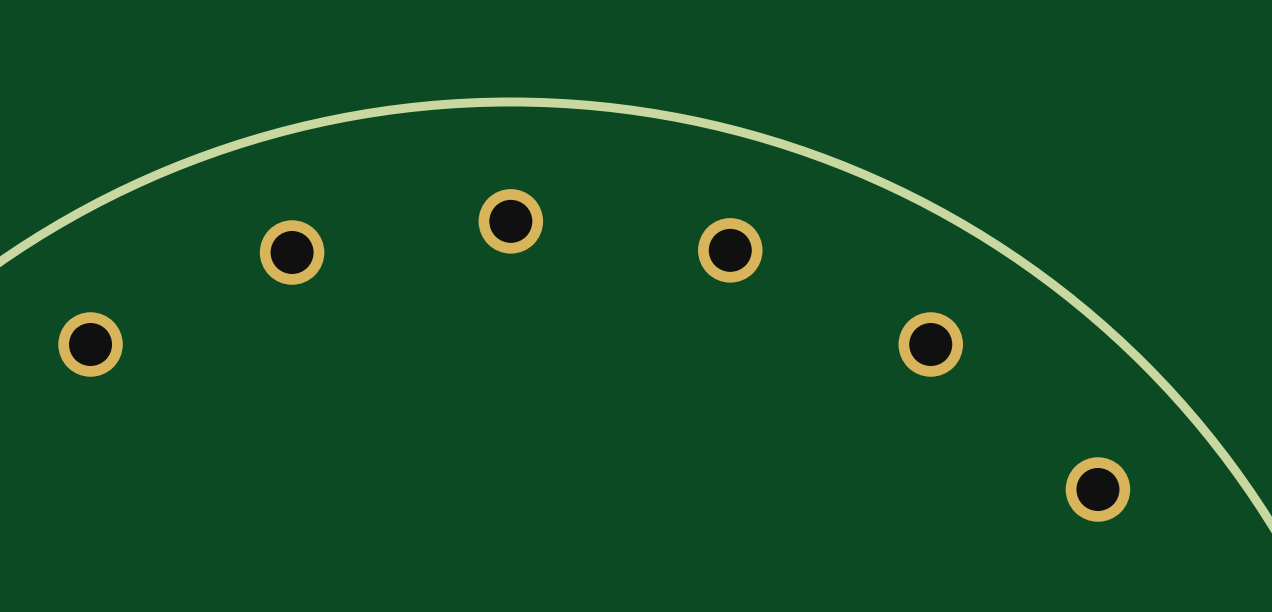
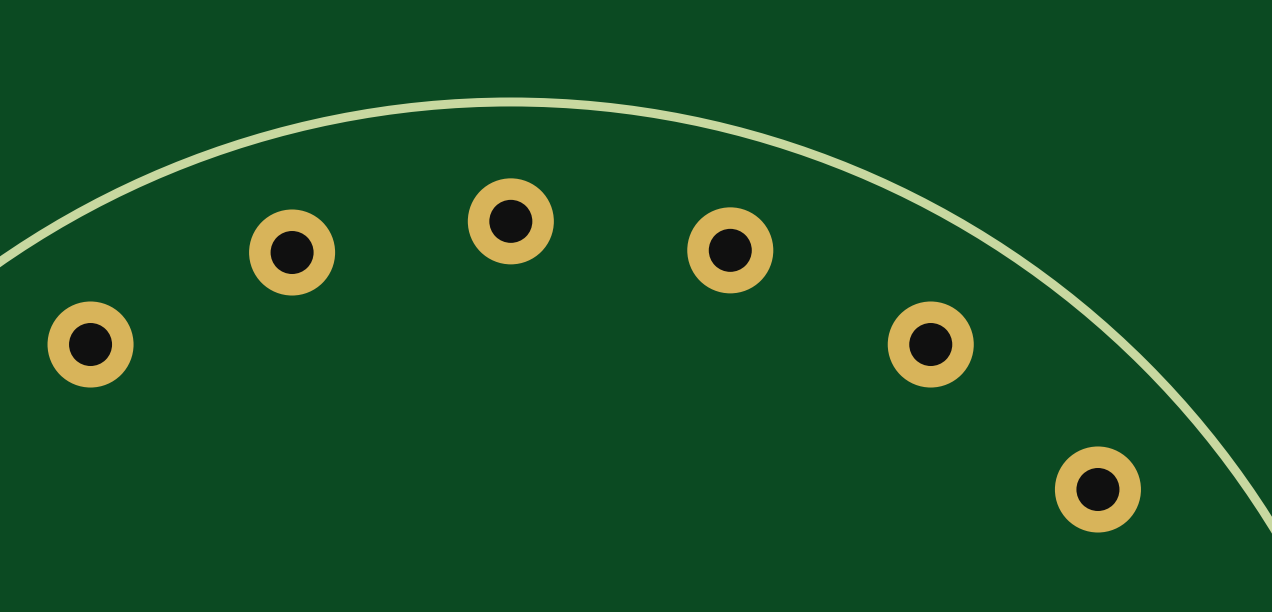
part footprint: [478, 189, 544, 254] -> [467, 178, 554, 265]
part footprint: [698, 218, 763, 283] -> [687, 207, 774, 294]
part footprint: [259, 220, 325, 285] -> [249, 209, 336, 296]
part footprint: [58, 312, 123, 377] -> [47, 301, 134, 388]
part footprint: [898, 312, 964, 377] -> [887, 301, 974, 388]
part footprint: [1065, 457, 1131, 522] -> [1054, 446, 1141, 533]

